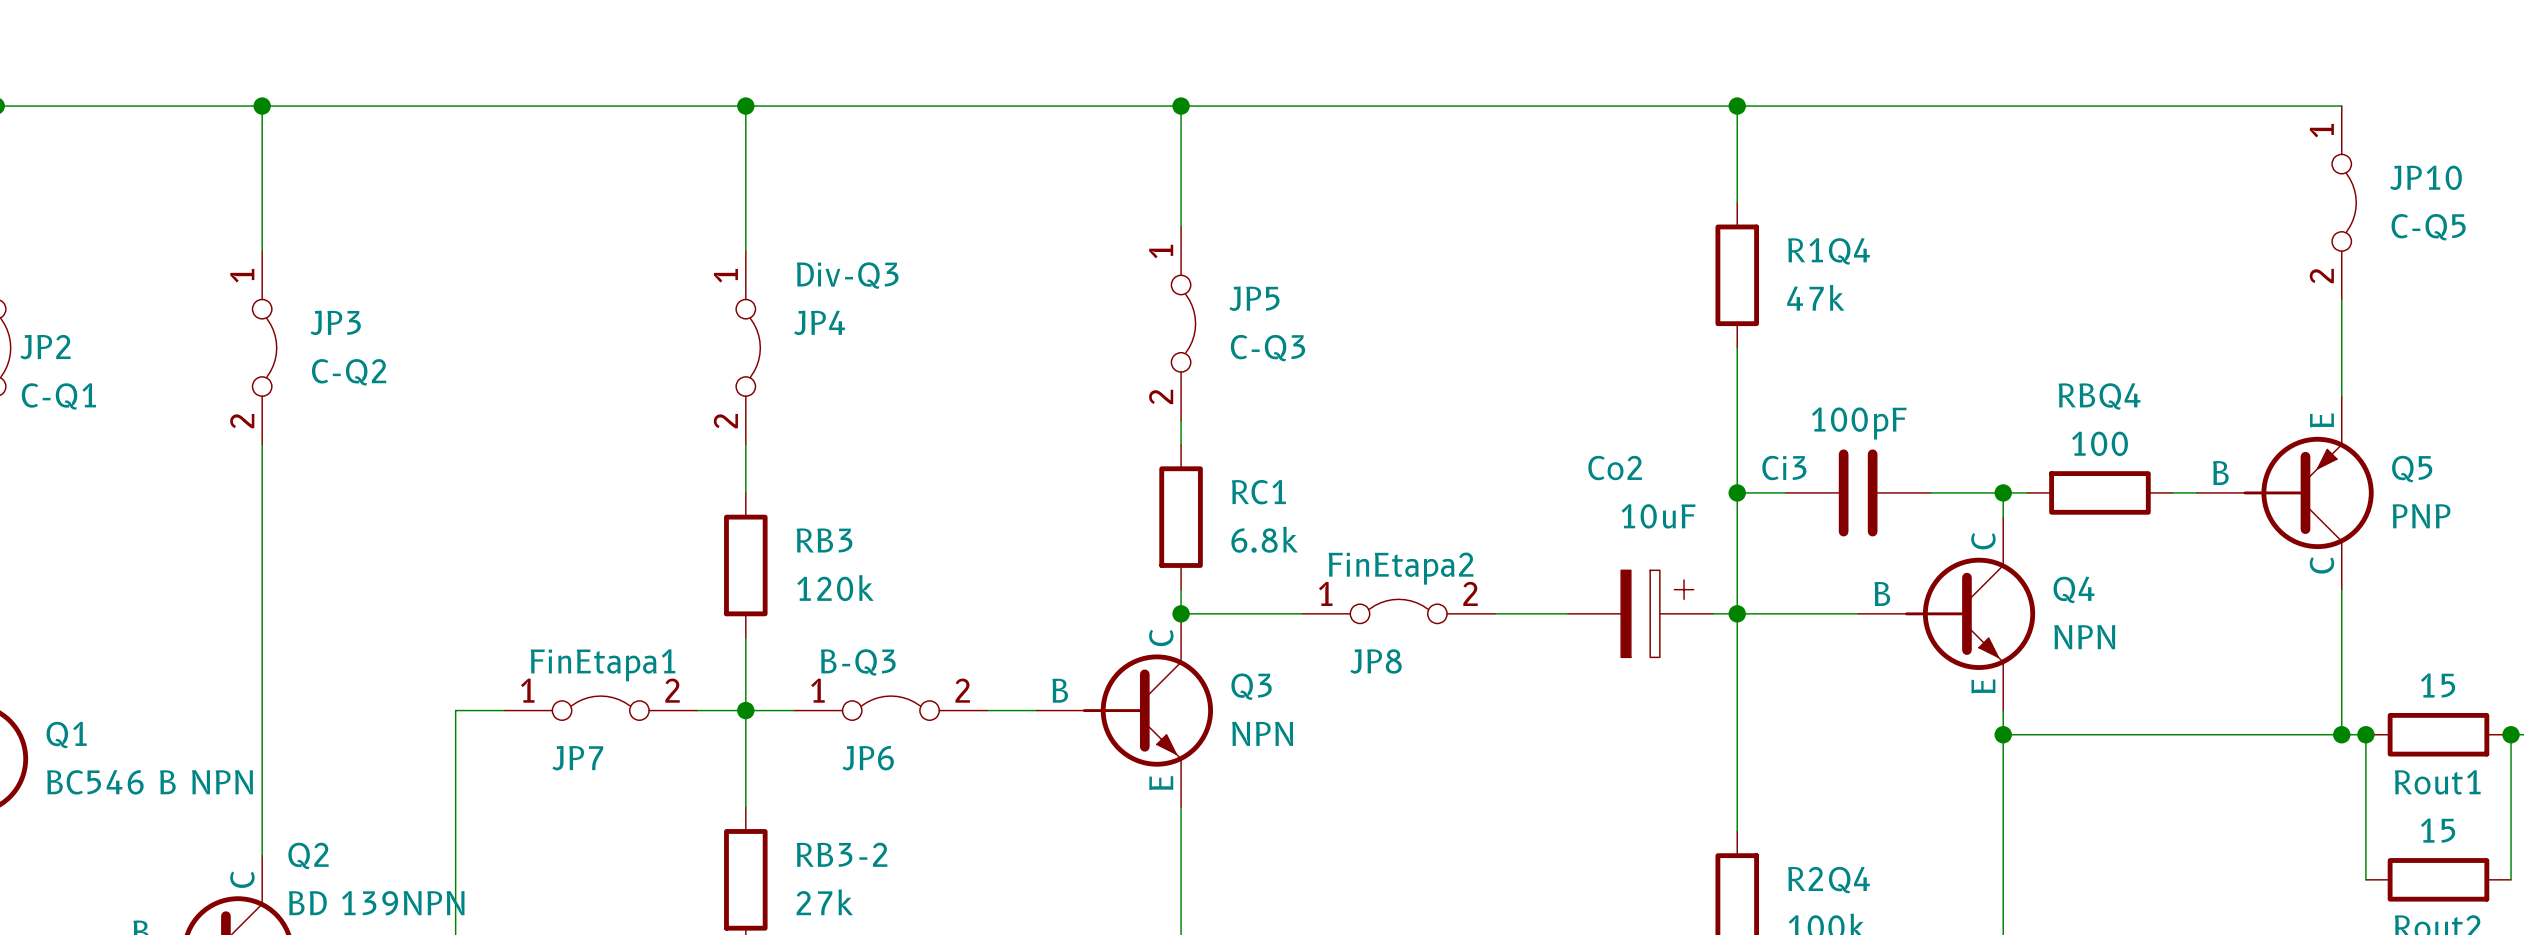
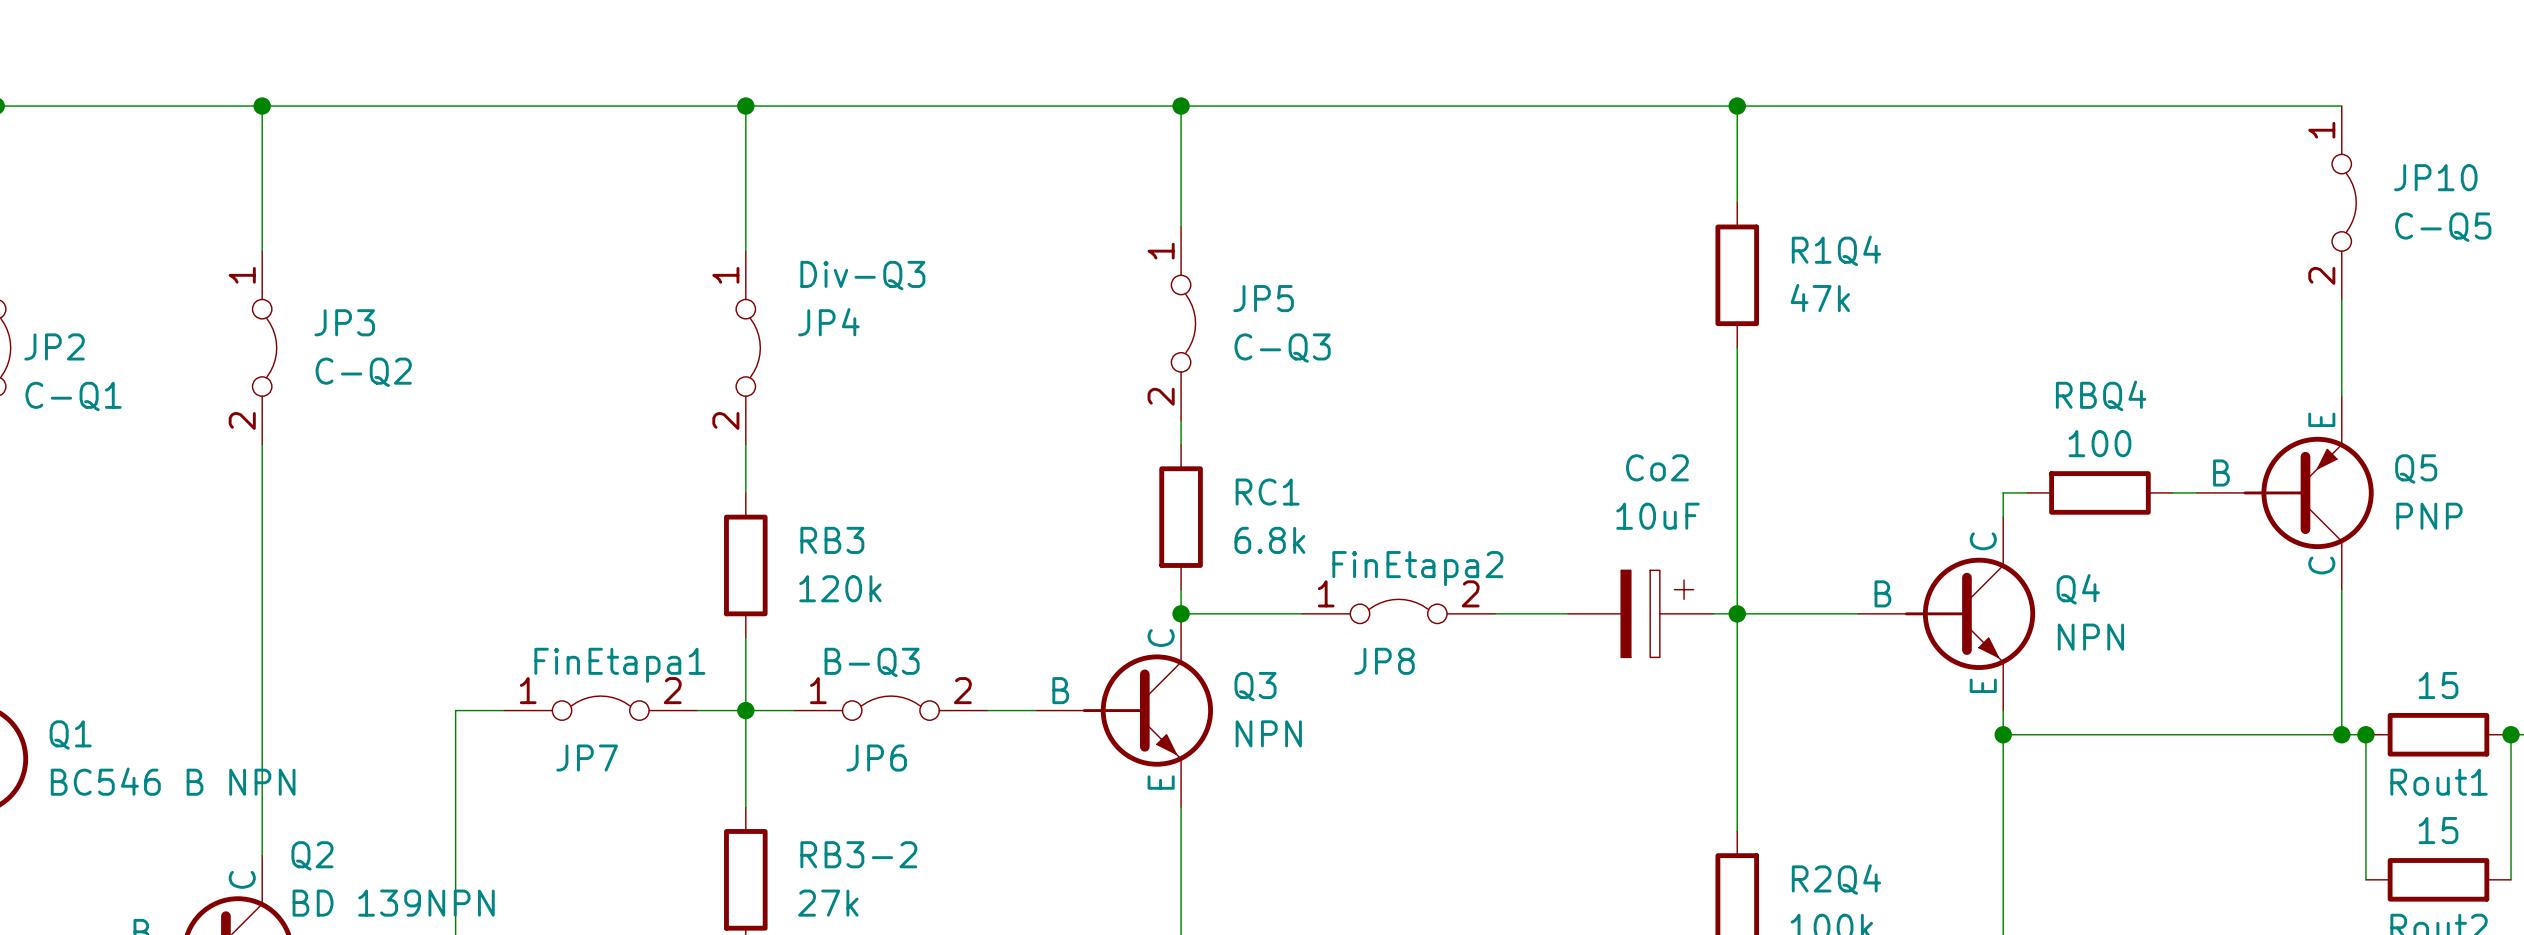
Co2 name position: Co2 (1615, 468) -> Co2 (1657, 467)
wire: (1737, 492) (1785, 492) -> none
junction: (1737, 492) -> none
Ci3: 100pF (1858, 492) -> none
wire: (1930, 492) (2003, 492) -> none
junction: (2003, 492) -> none

